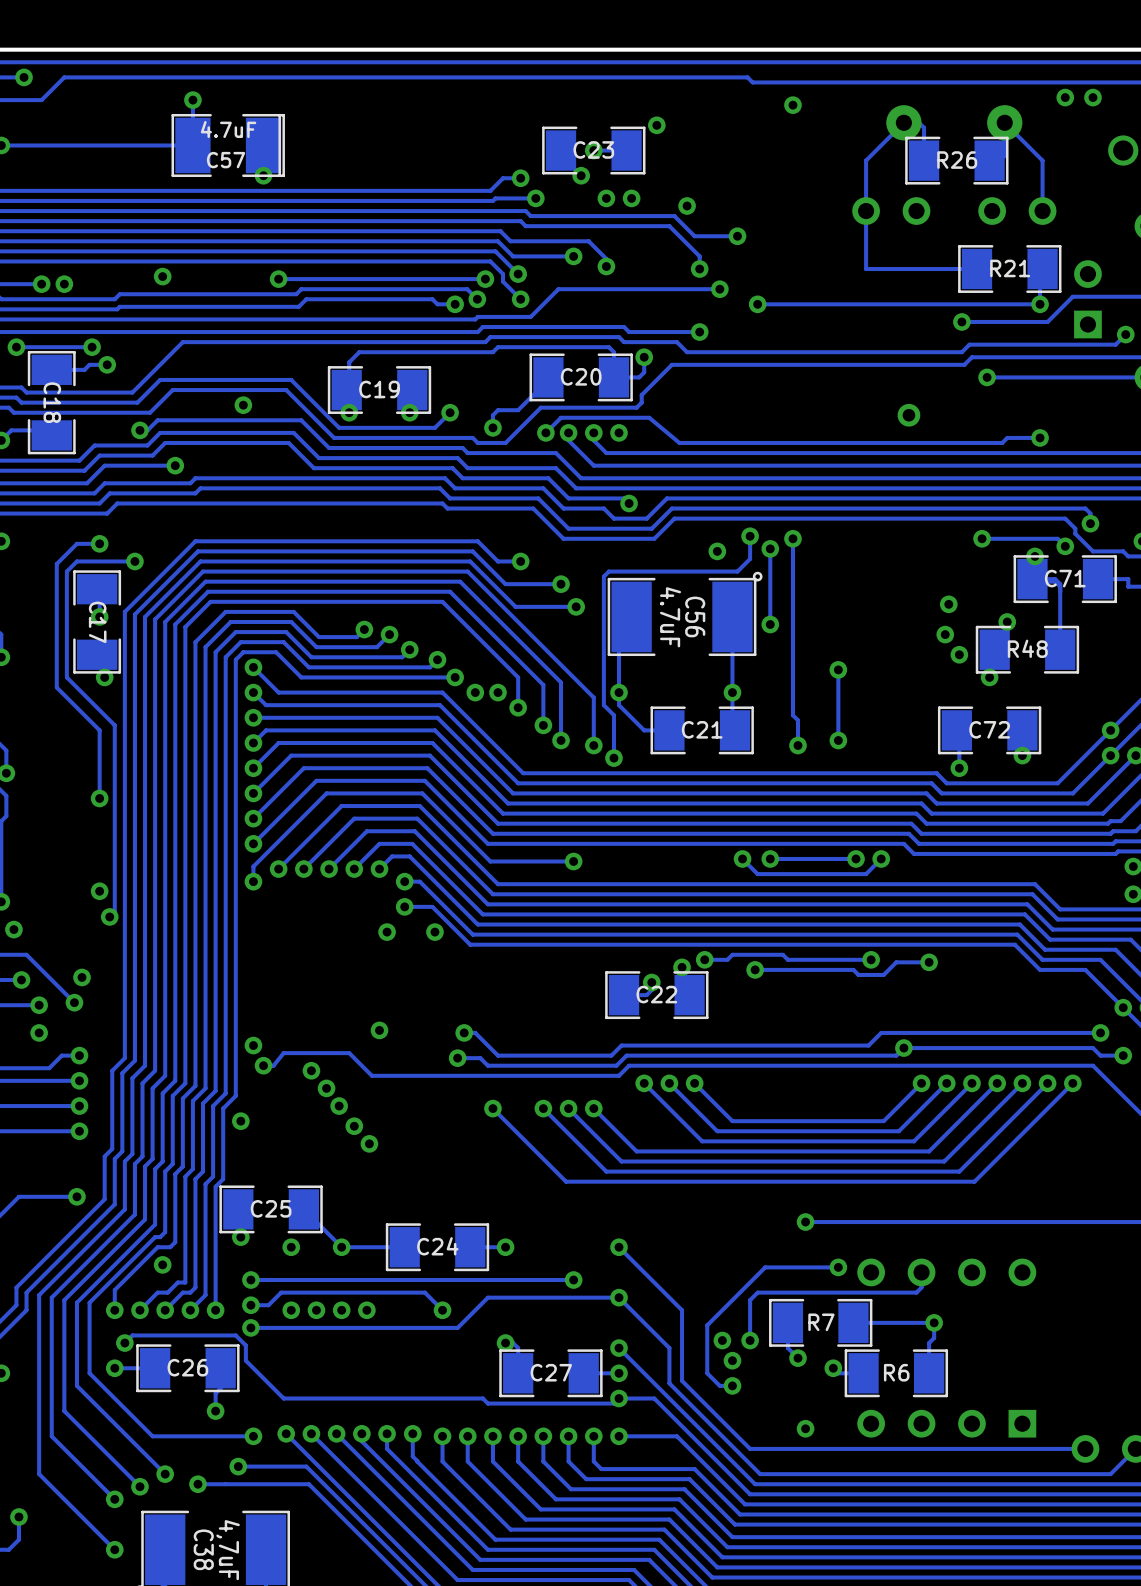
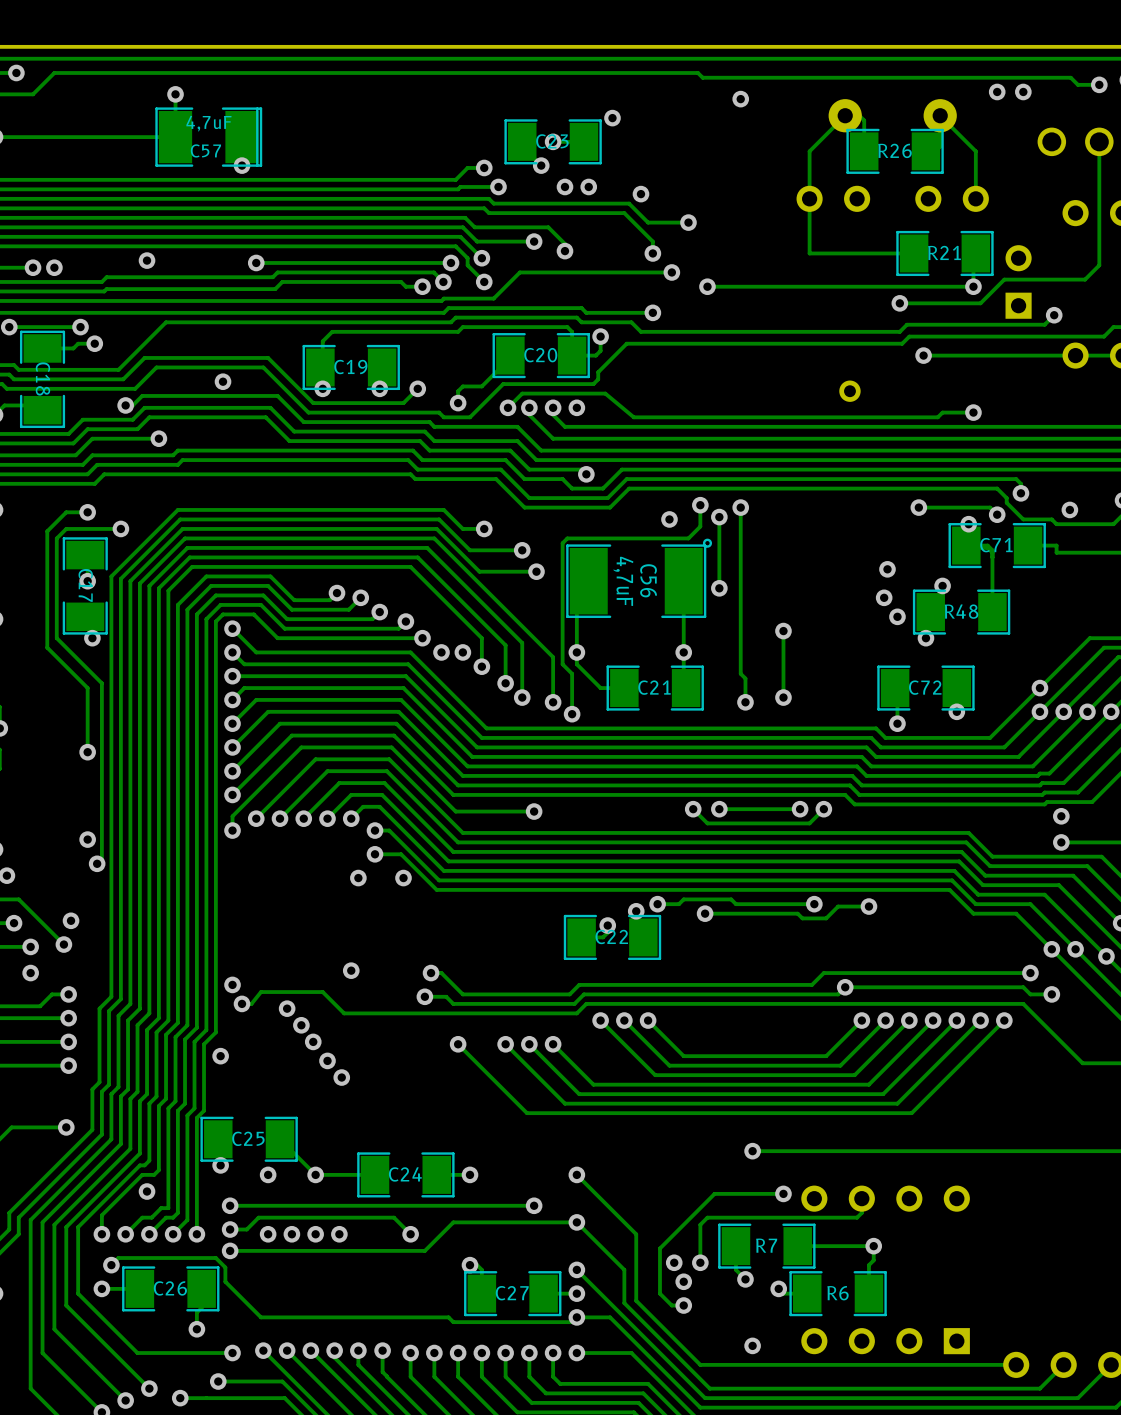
C57 value: 4.7uF (228, 129) -> 4,7uF (208, 123)
C56 value: 4.7uF (670, 617) -> 4,7uF (623, 581)

